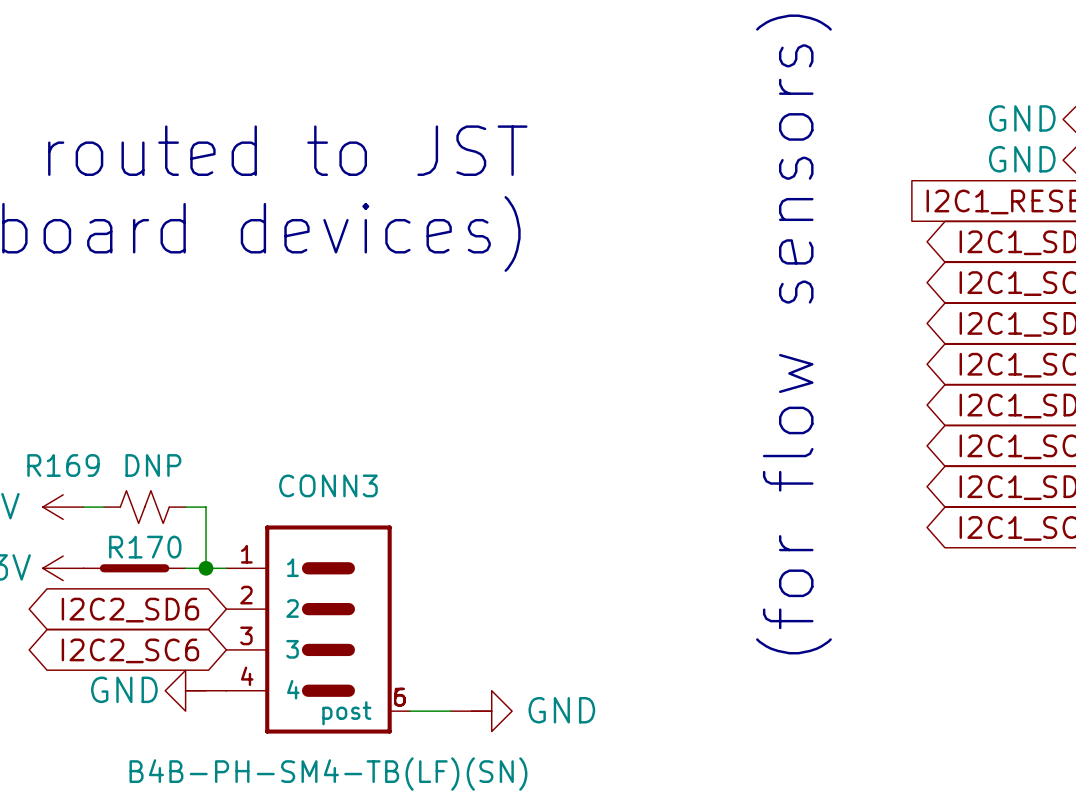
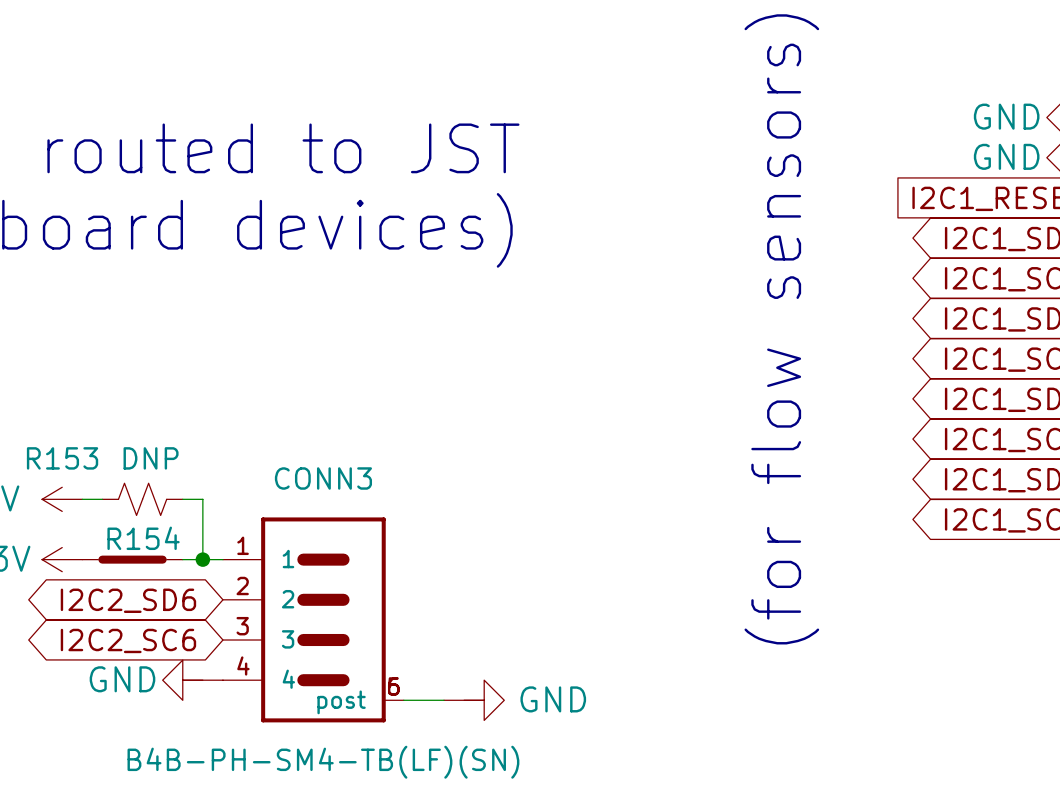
R169 name: R169 (63, 465) -> R153 (62, 458)
R170 name: R170 (145, 547) -> R154 (143, 538)

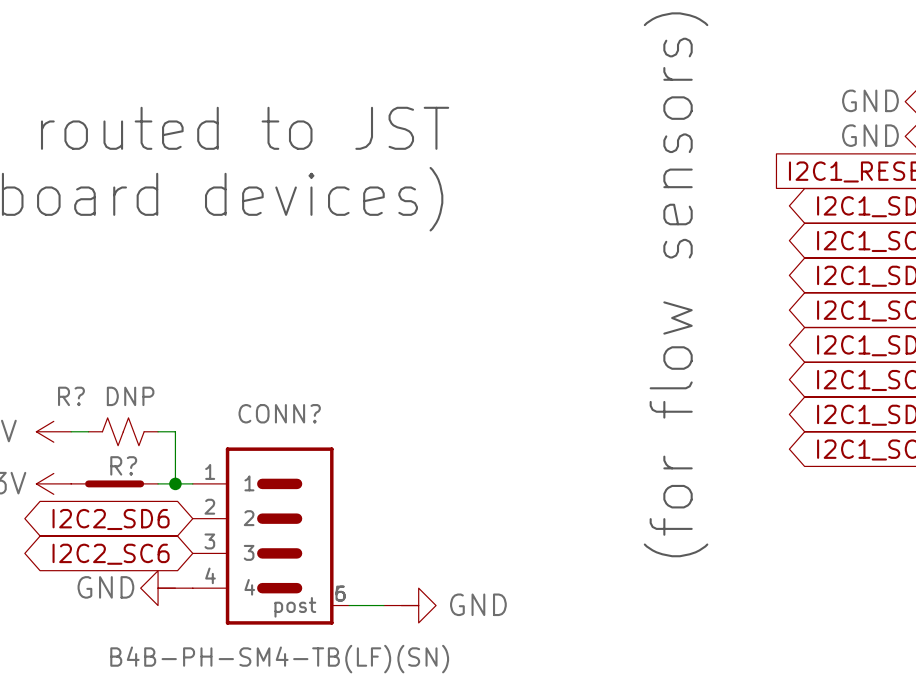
R153 name: R153 (62, 458) -> R? (71, 396)
CONN3 name: CONN3 (323, 478) -> CONN? (279, 413)
R154 name: R154 (143, 538) -> R? (123, 465)

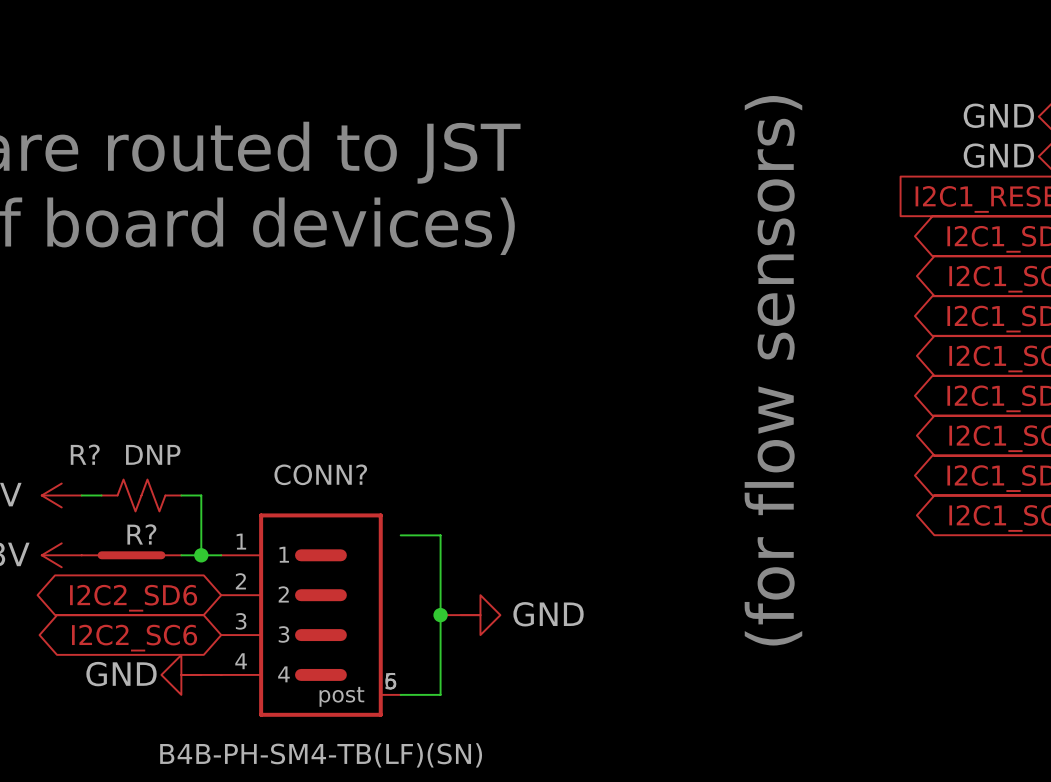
wire: none -> (400, 535) (440, 535) (440, 694)
junction: none -> (440, 615)
power symbol position: GND (410, 605) -> GND (470, 615)

